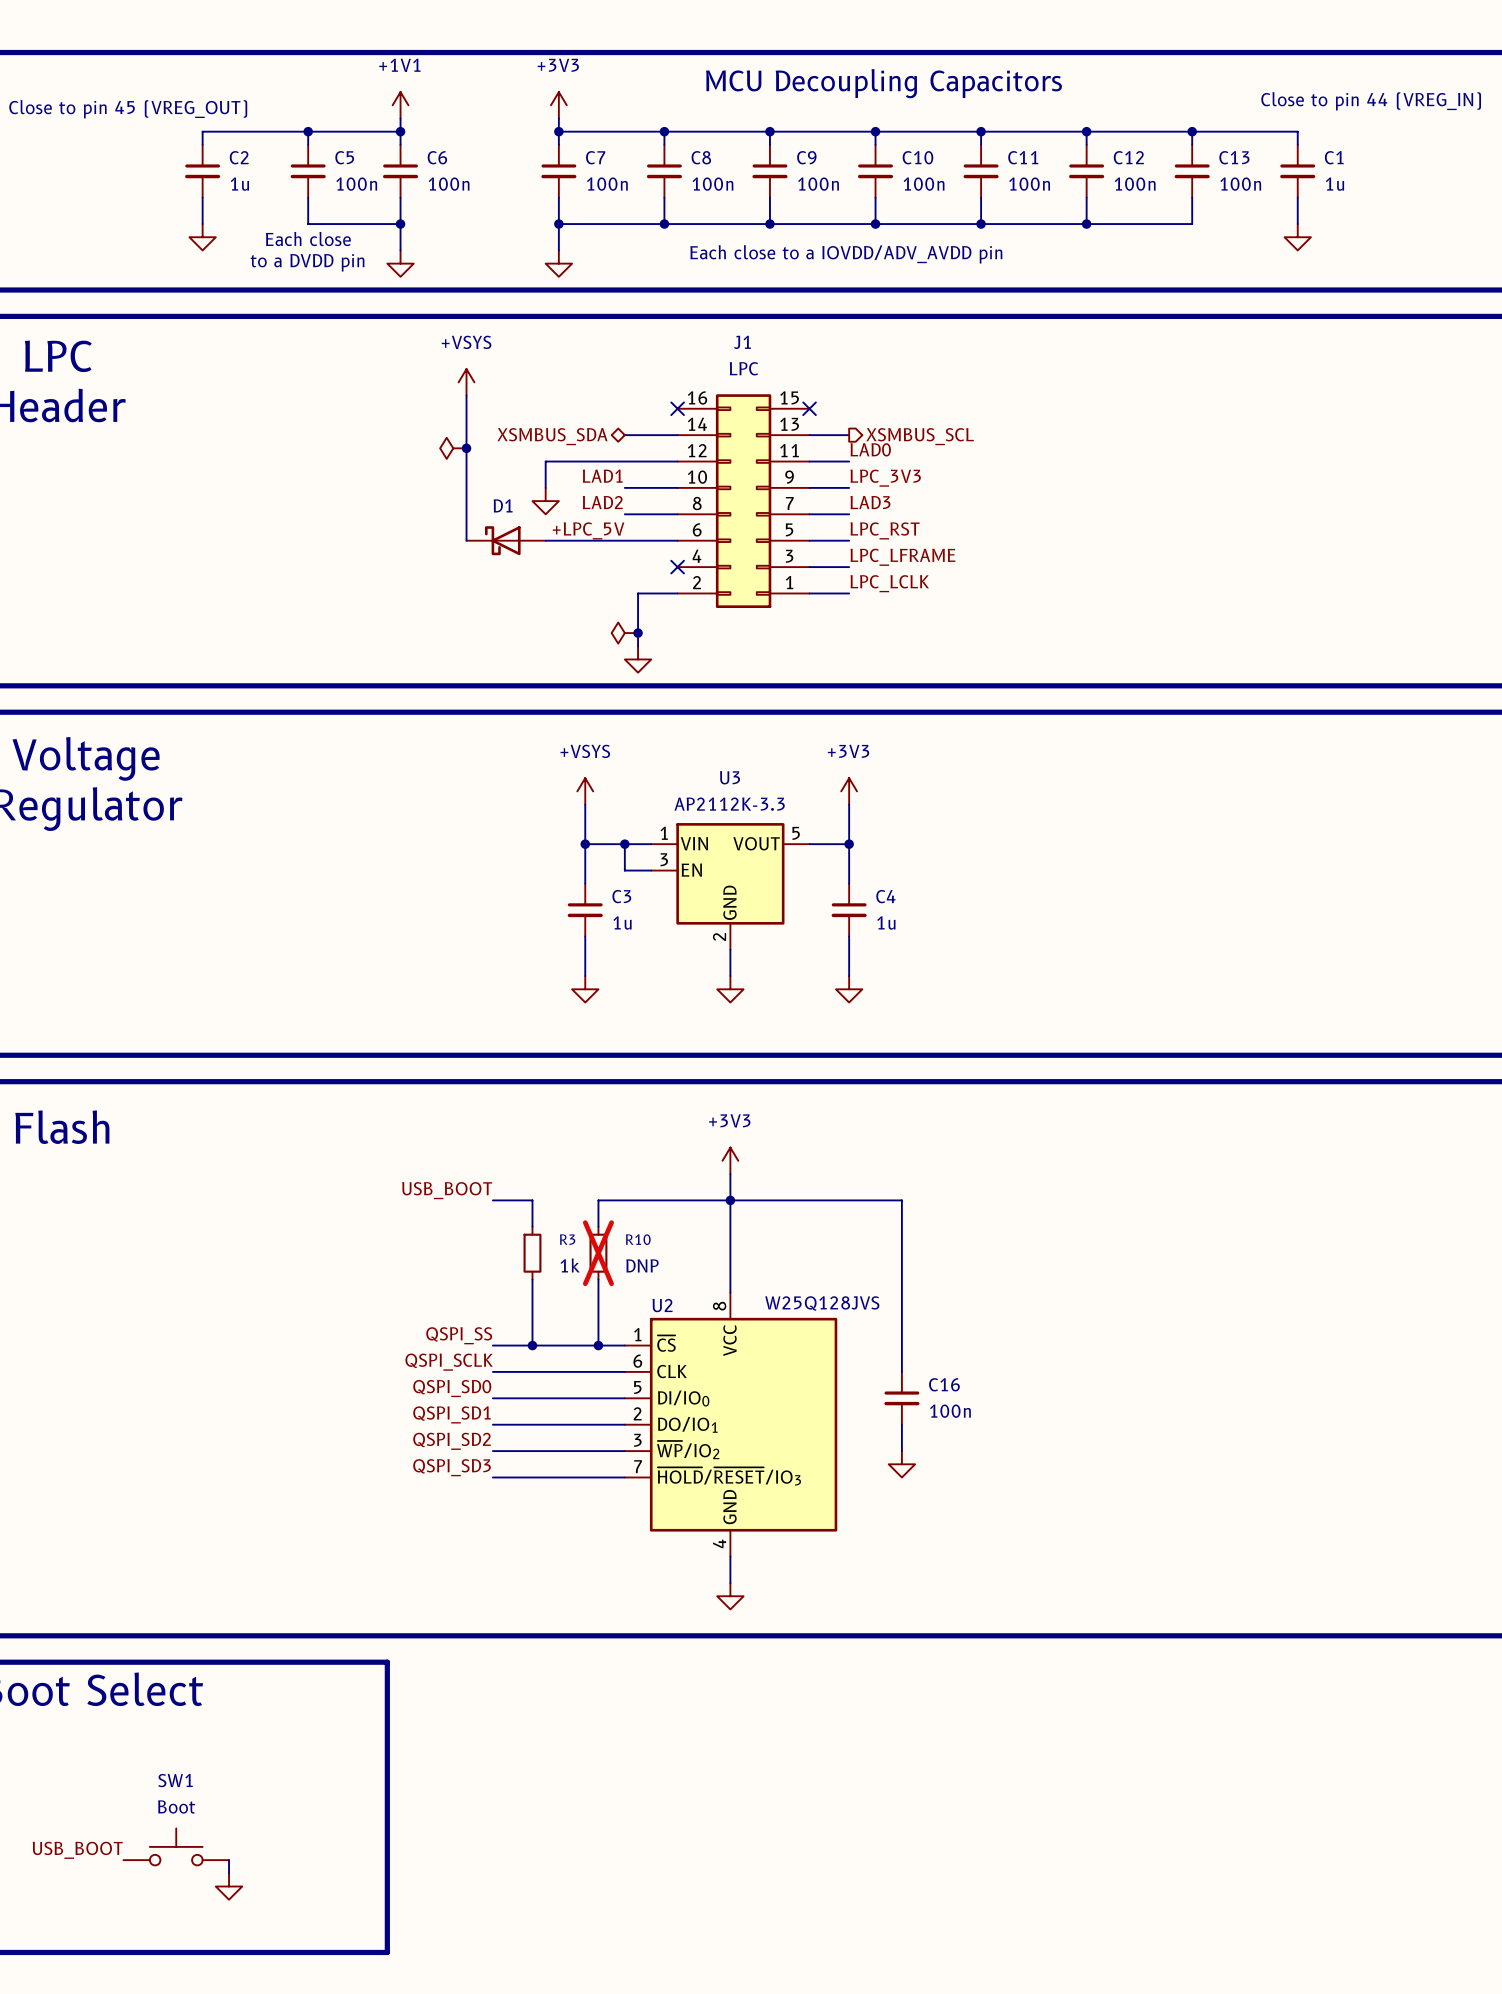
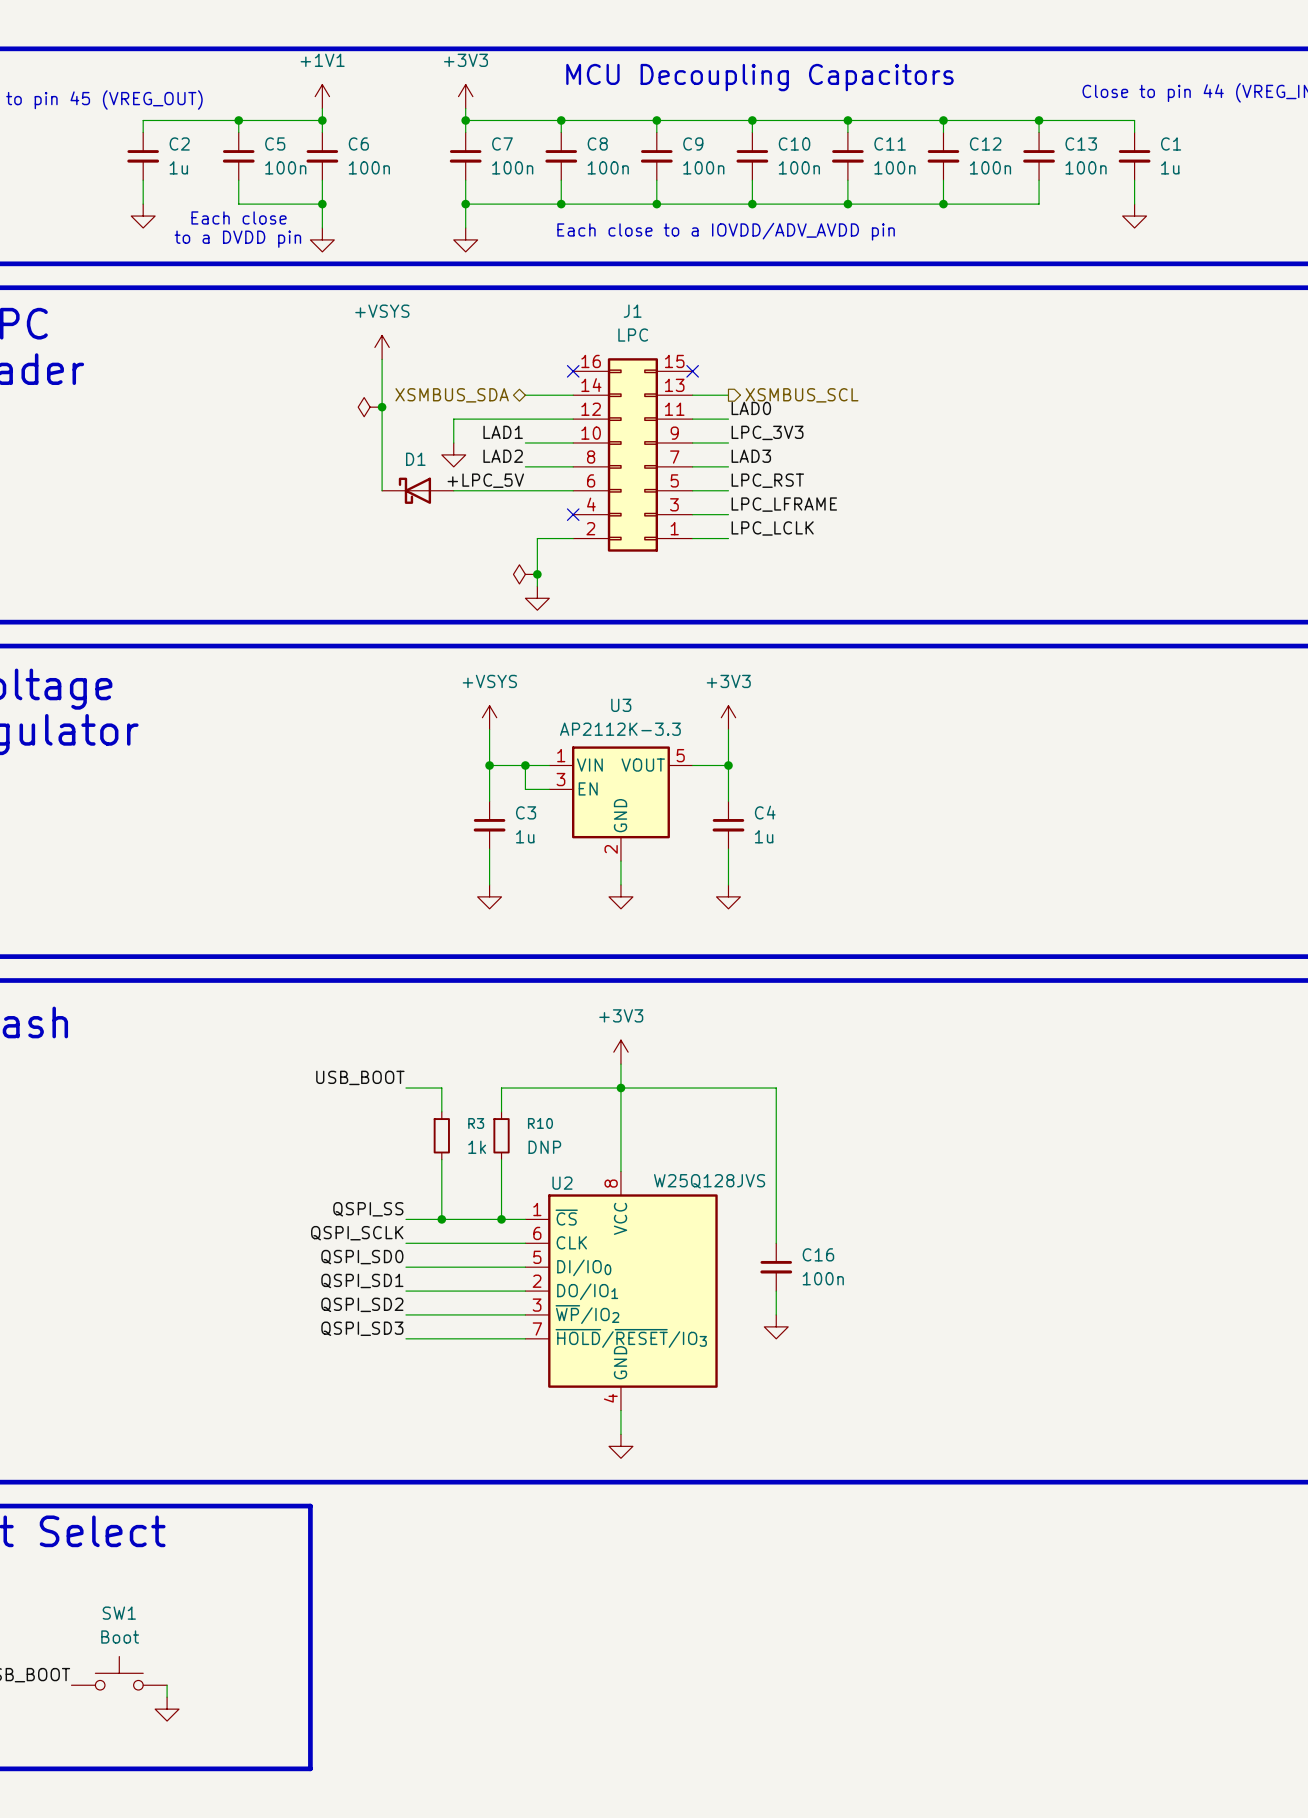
R10 do-not-place cross: (598, 1253) -> none

